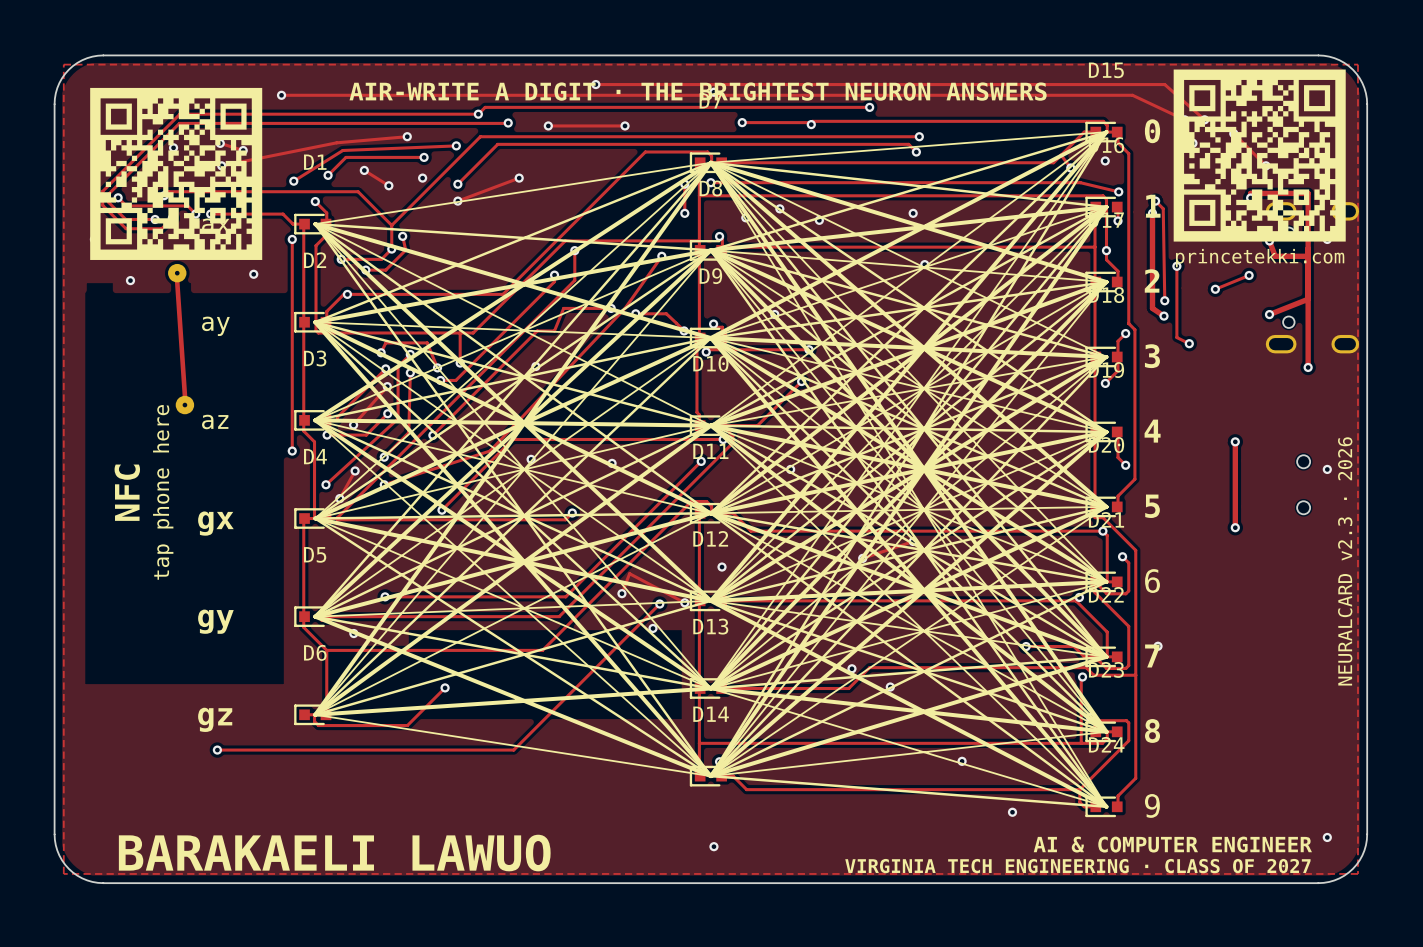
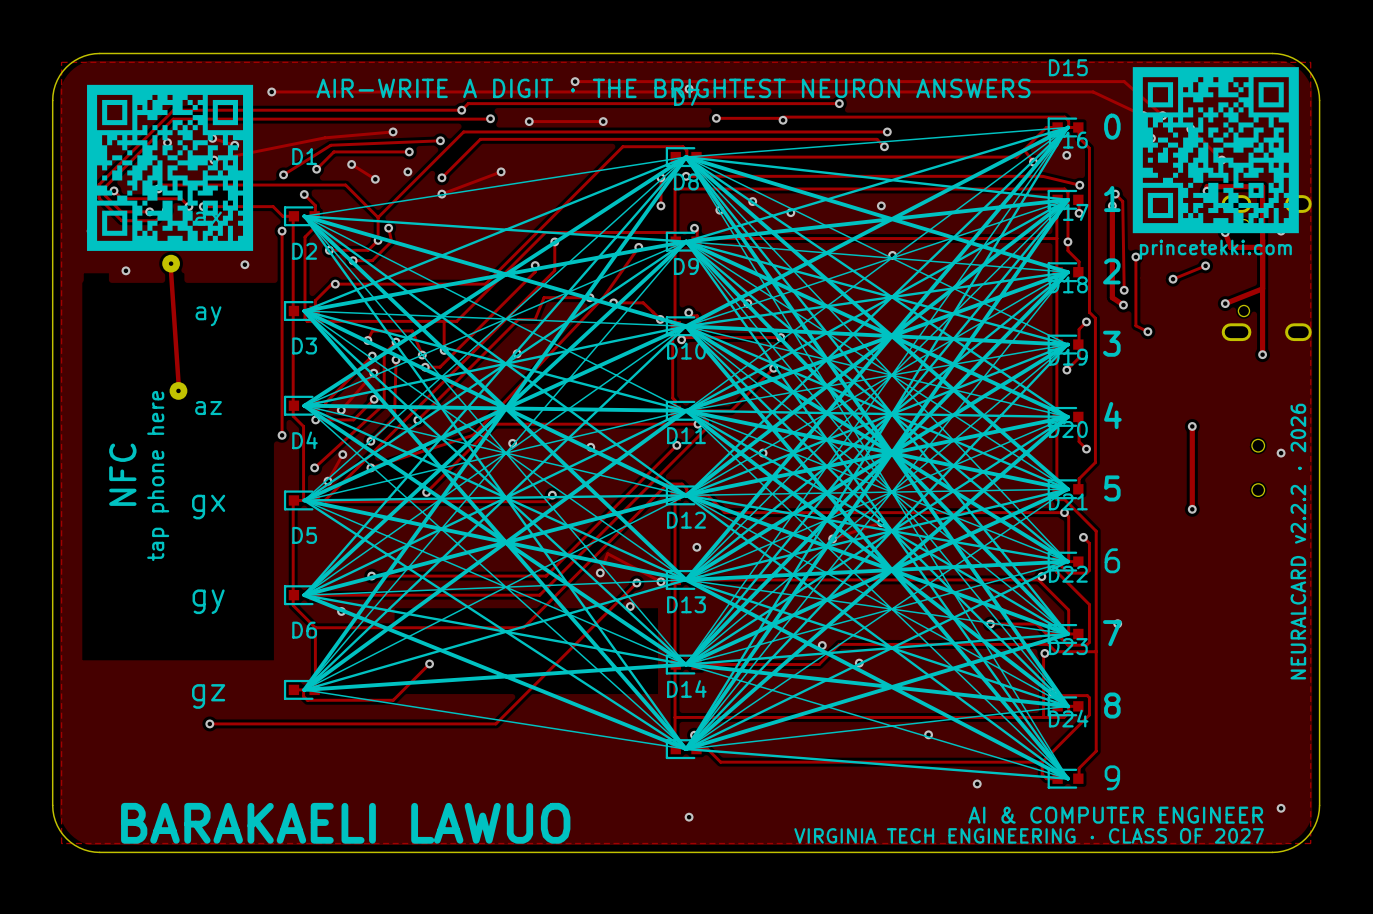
text: NEURALCARD v2.3 · 2026 (1345, 561) -> NEURALCARD v2.2.2 · 2026 (1298, 541)

